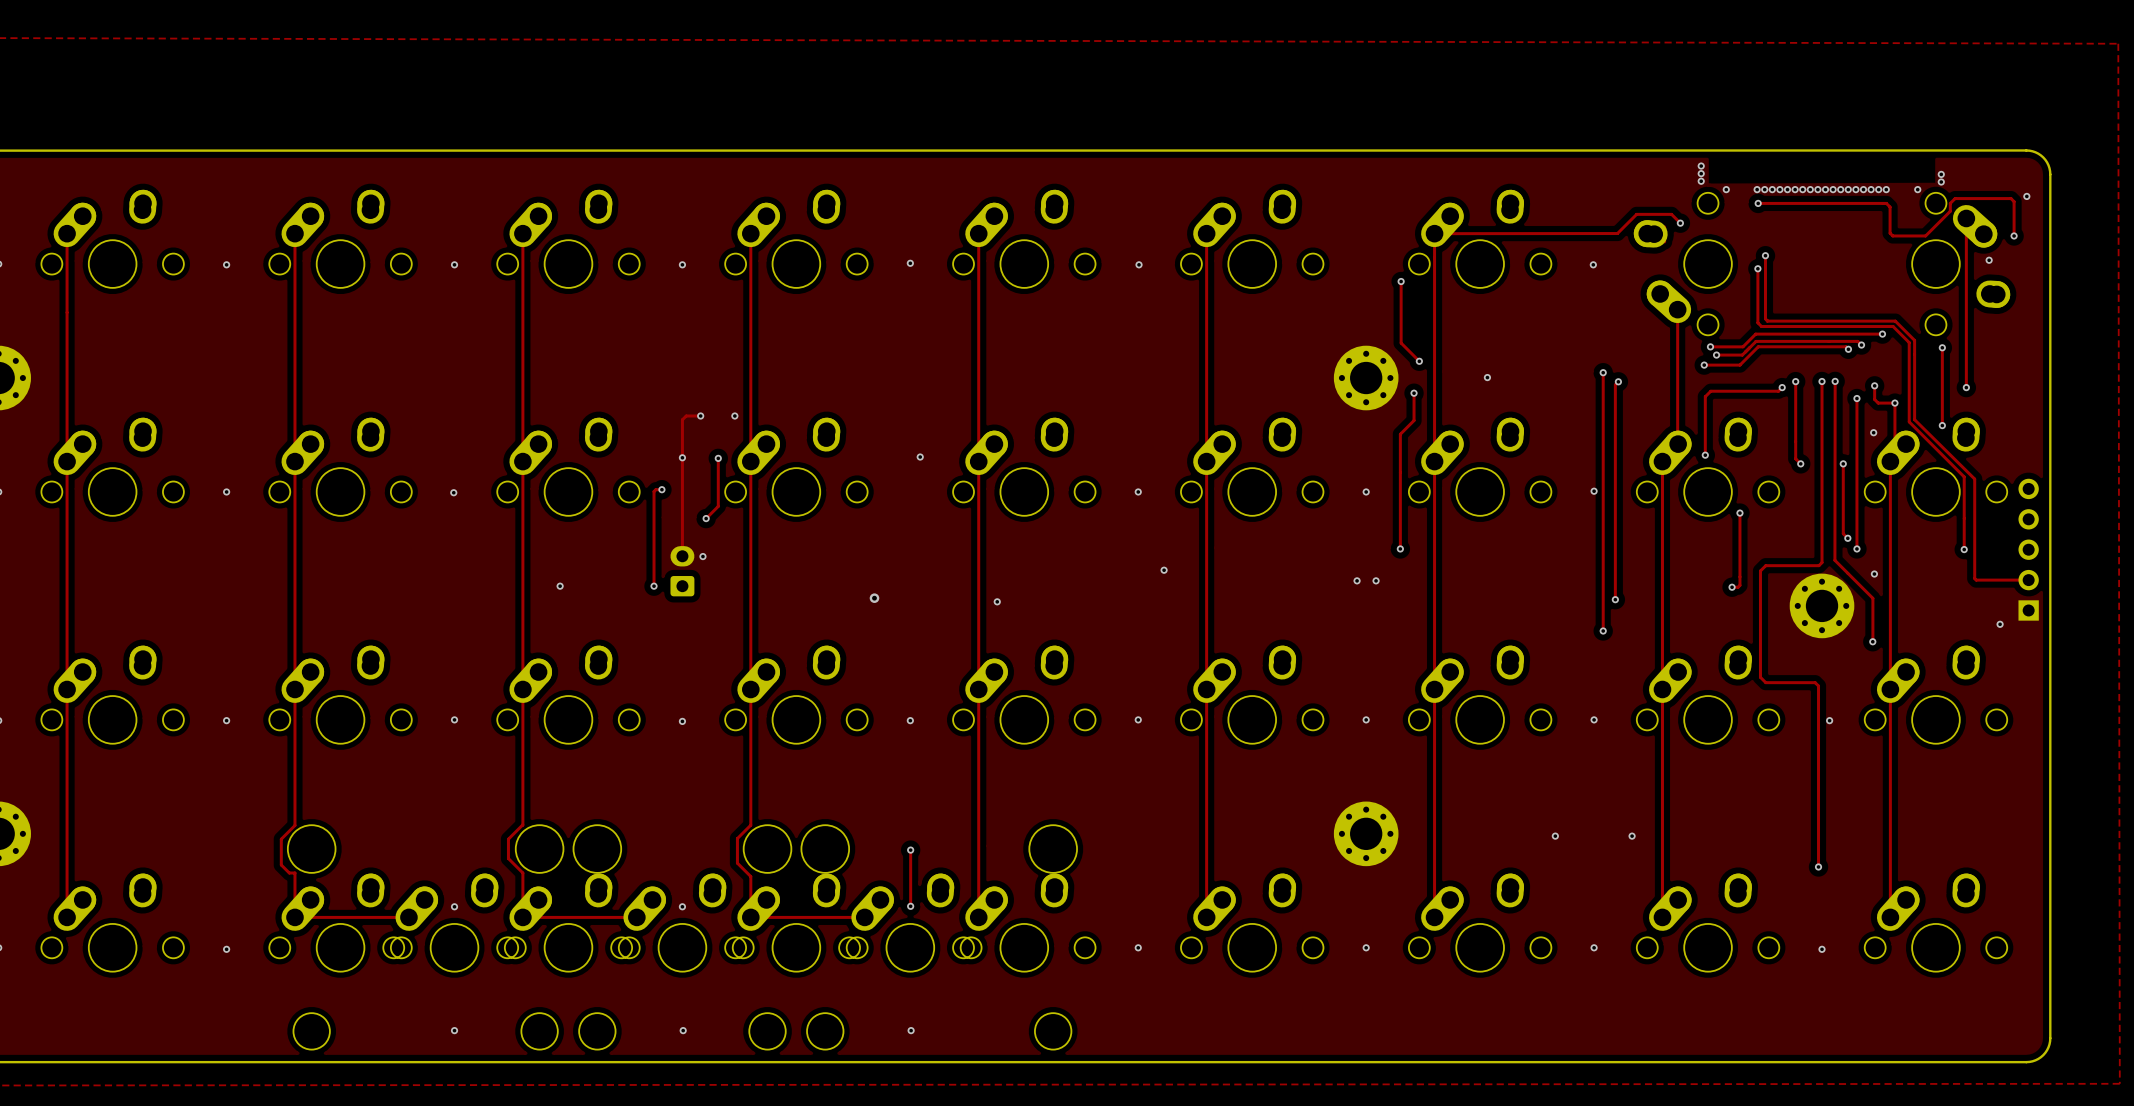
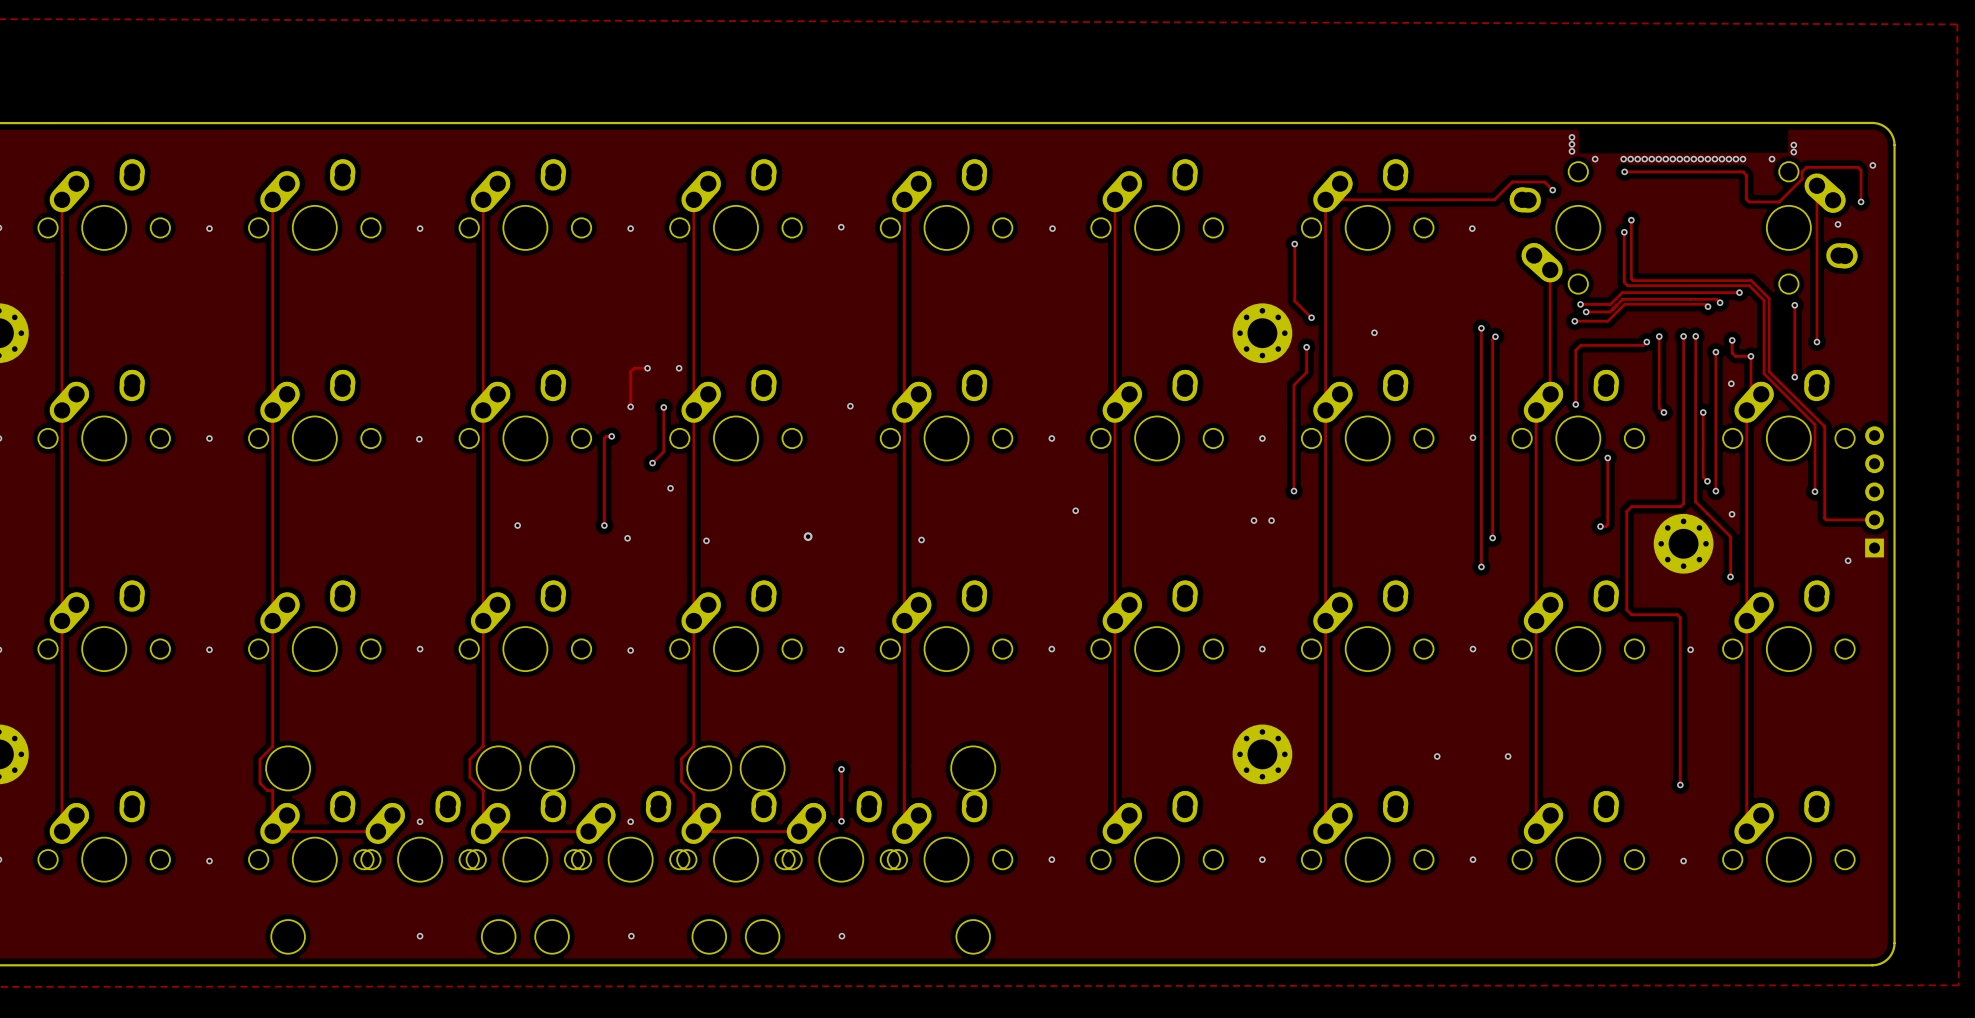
track: (682, 457) (682, 556) -> none
via: none -> (670, 488)
via: (702, 556) -> none
part: (682, 571) -> none
via: none -> (627, 538)
via: none -> (706, 540)

